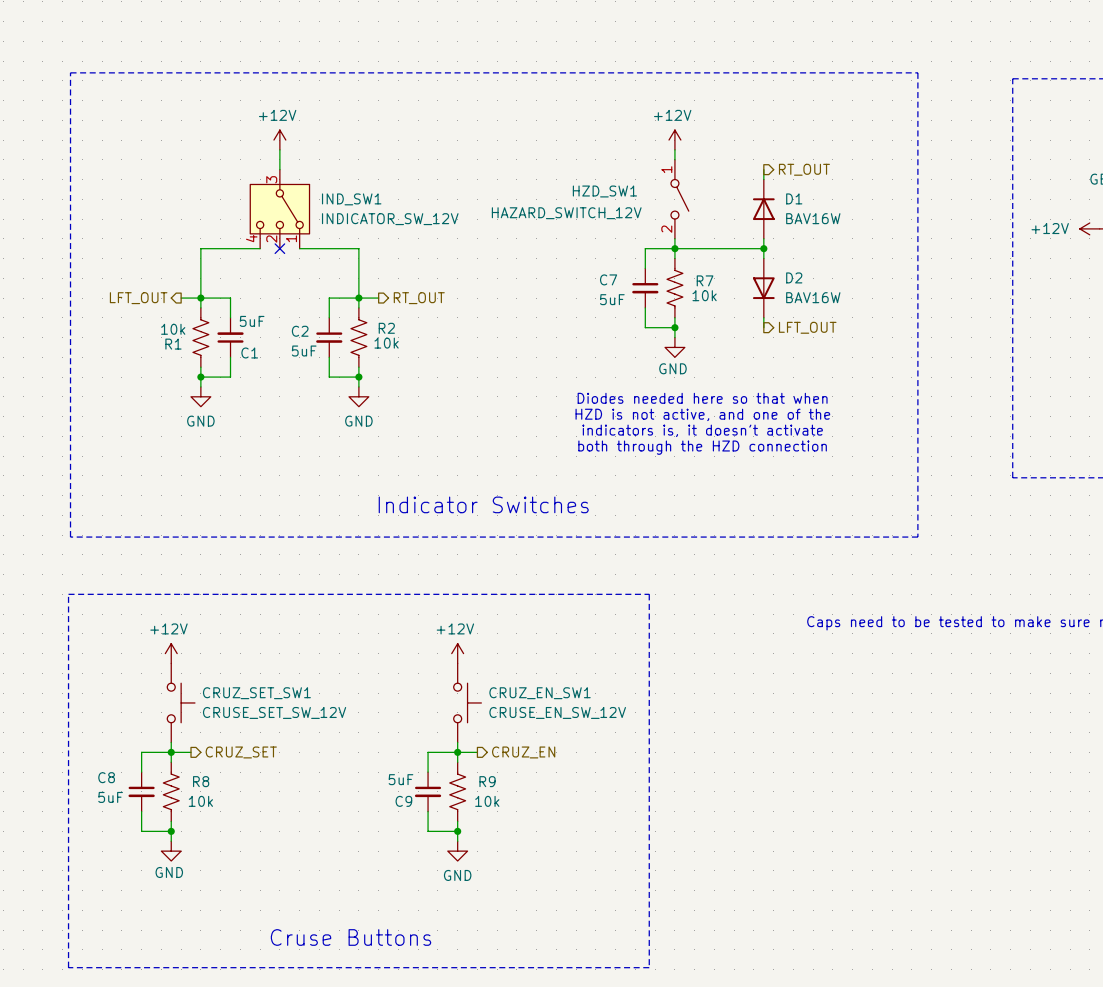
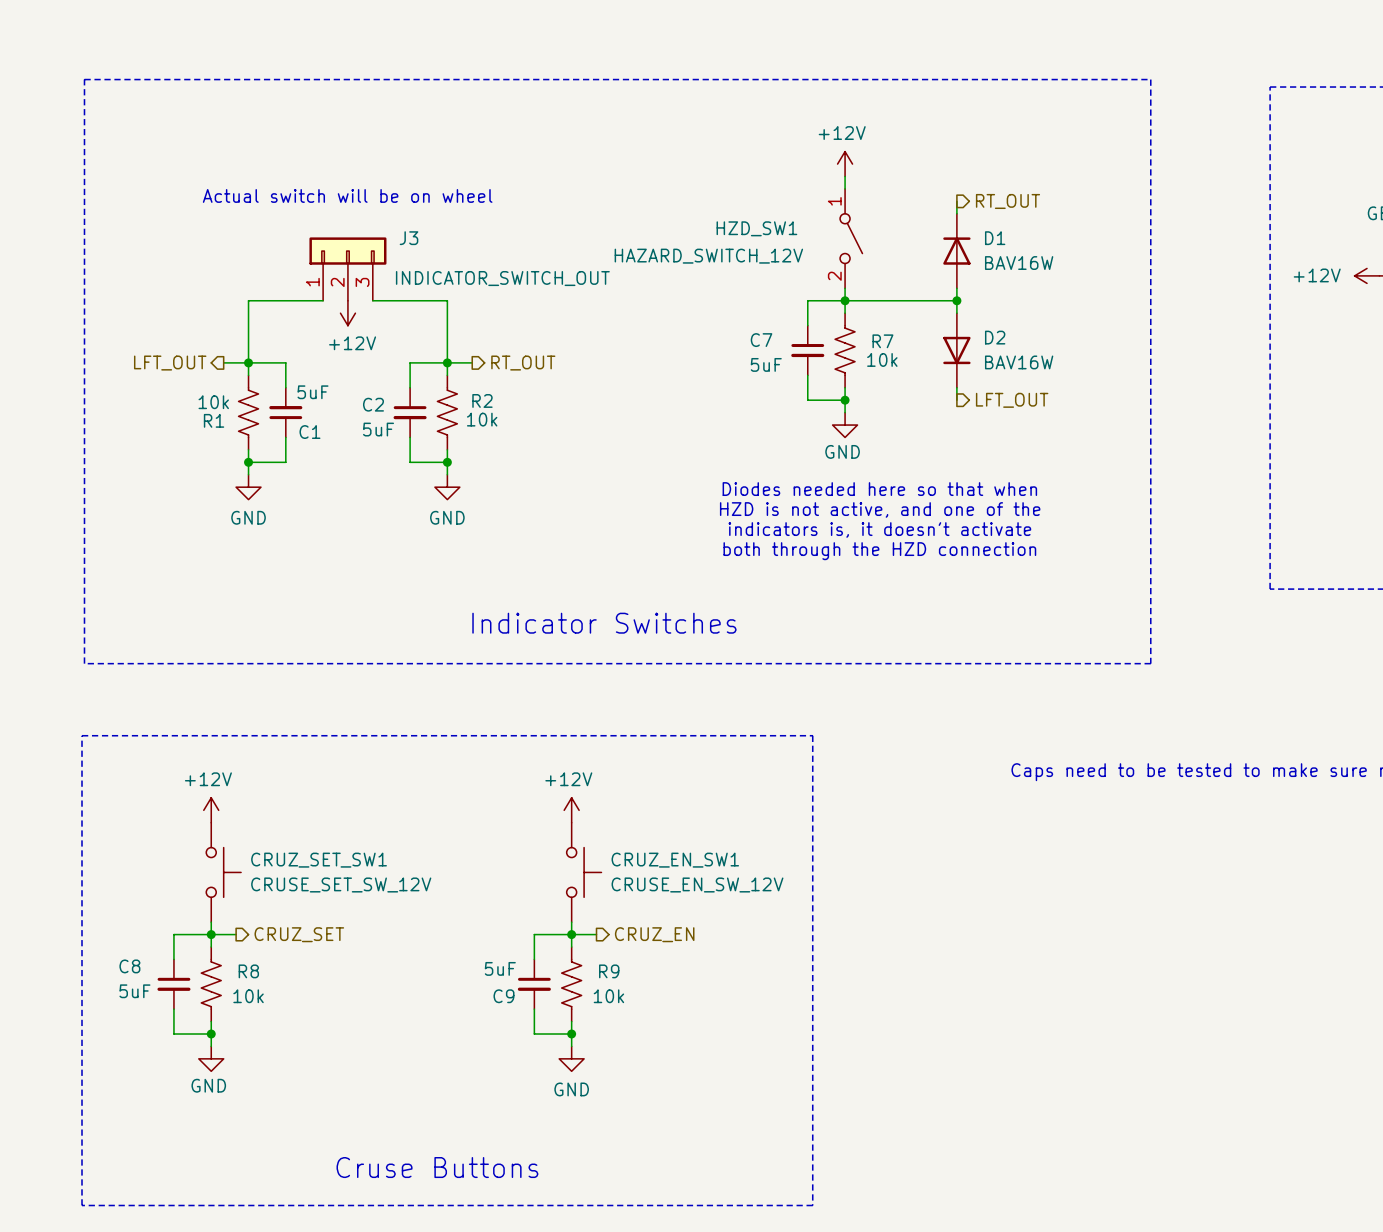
power symbol rotation: 0° (279, 140) -> 180° (347, 313)
power symbol position: +12V (279, 140) -> +12V (347, 313)
wire: (279, 149) (279, 169) -> none
text: none -> Actual switch will be on wheel (347, 195)
IND_SW1: INDICATOR_SW_12V (279, 209) -> none
J3: none -> INDICATOR_SWITCH_OUT (347, 269)
no-connect mark: (279, 248) -> none

